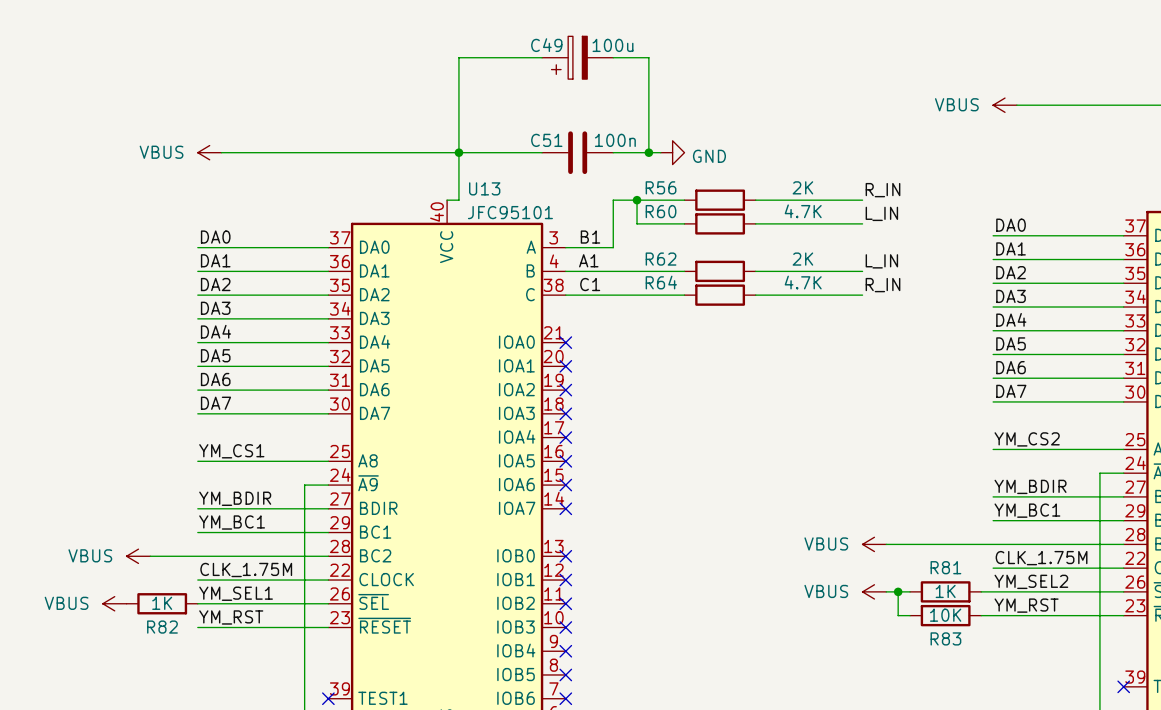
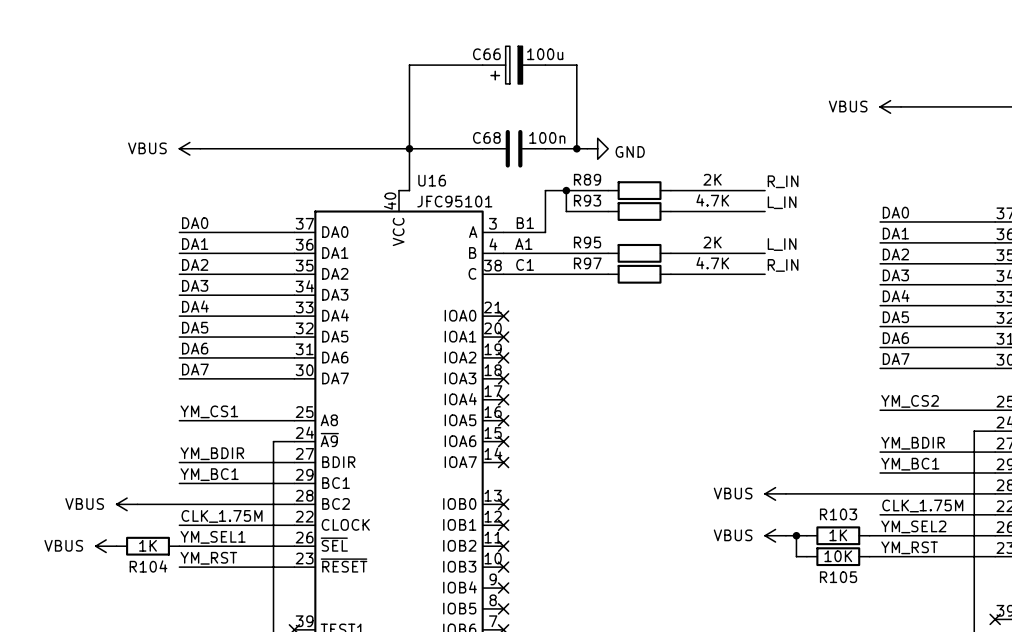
C49 name: C49 (546, 45) -> C66 (486, 54)
C51 name: C51 (546, 140) -> C68 (486, 137)
R56 name: R56 (661, 187) -> R89 (587, 179)
U13 name: U13 (484, 188) -> U16 (432, 180)
R60 name: R60 (661, 211) -> R93 (587, 200)
R62 name: R62 (661, 259) -> R95 (587, 242)
R64 name: R64 (661, 282) -> R97 (587, 263)
R81 name: R81 (945, 567) -> R103 (838, 514)
R82 name: R82 (162, 627) -> R104 (148, 566)
R83 name: R83 (945, 638) -> R105 (838, 577)

